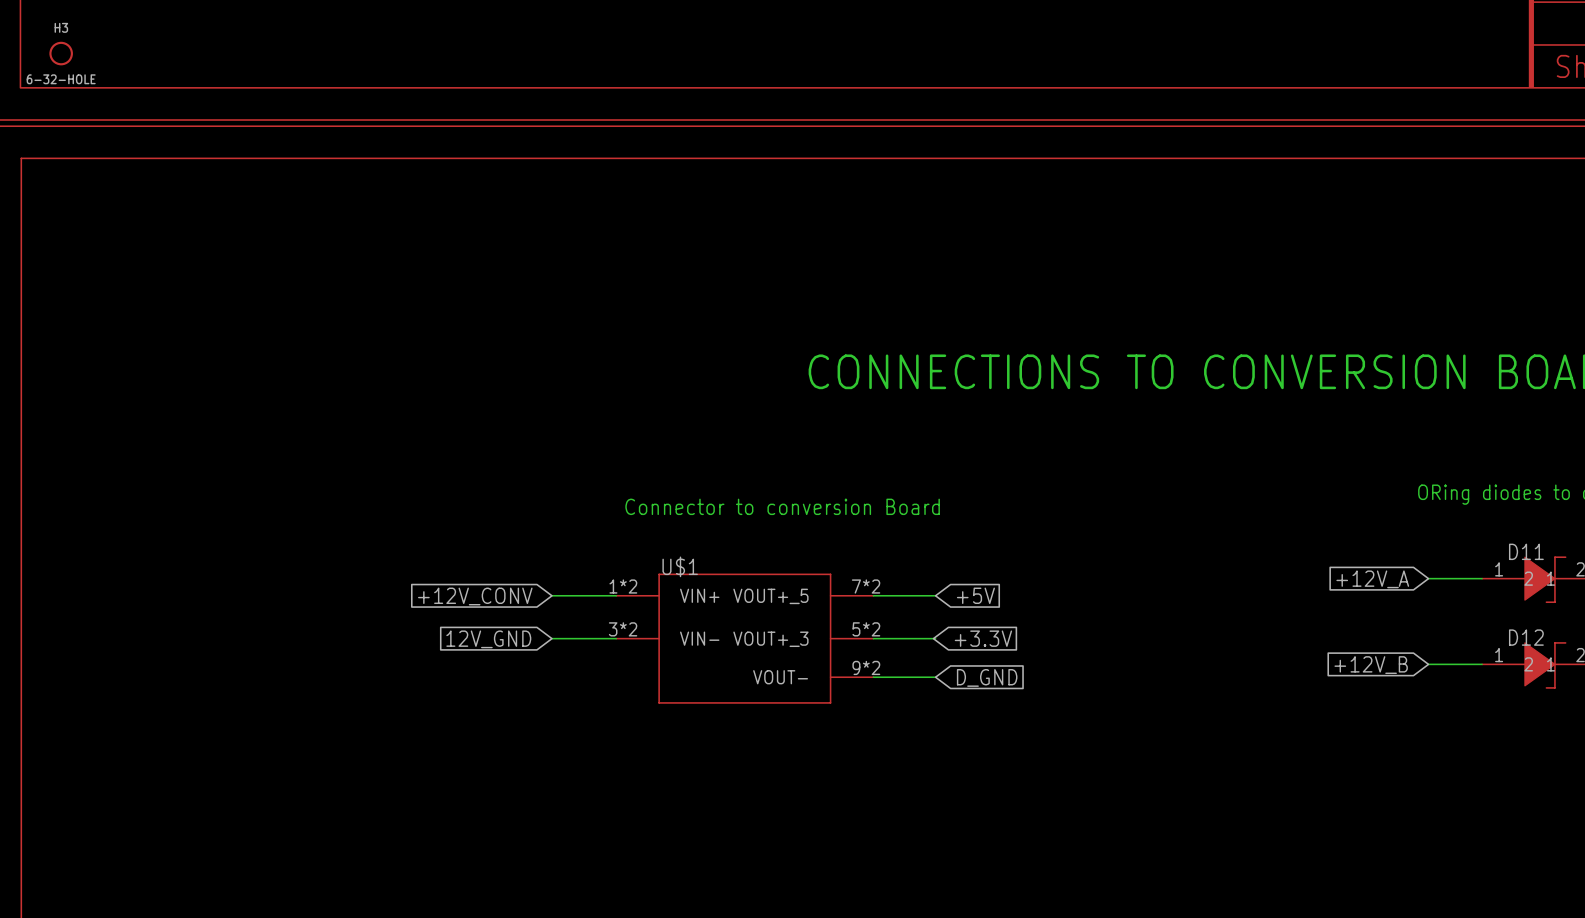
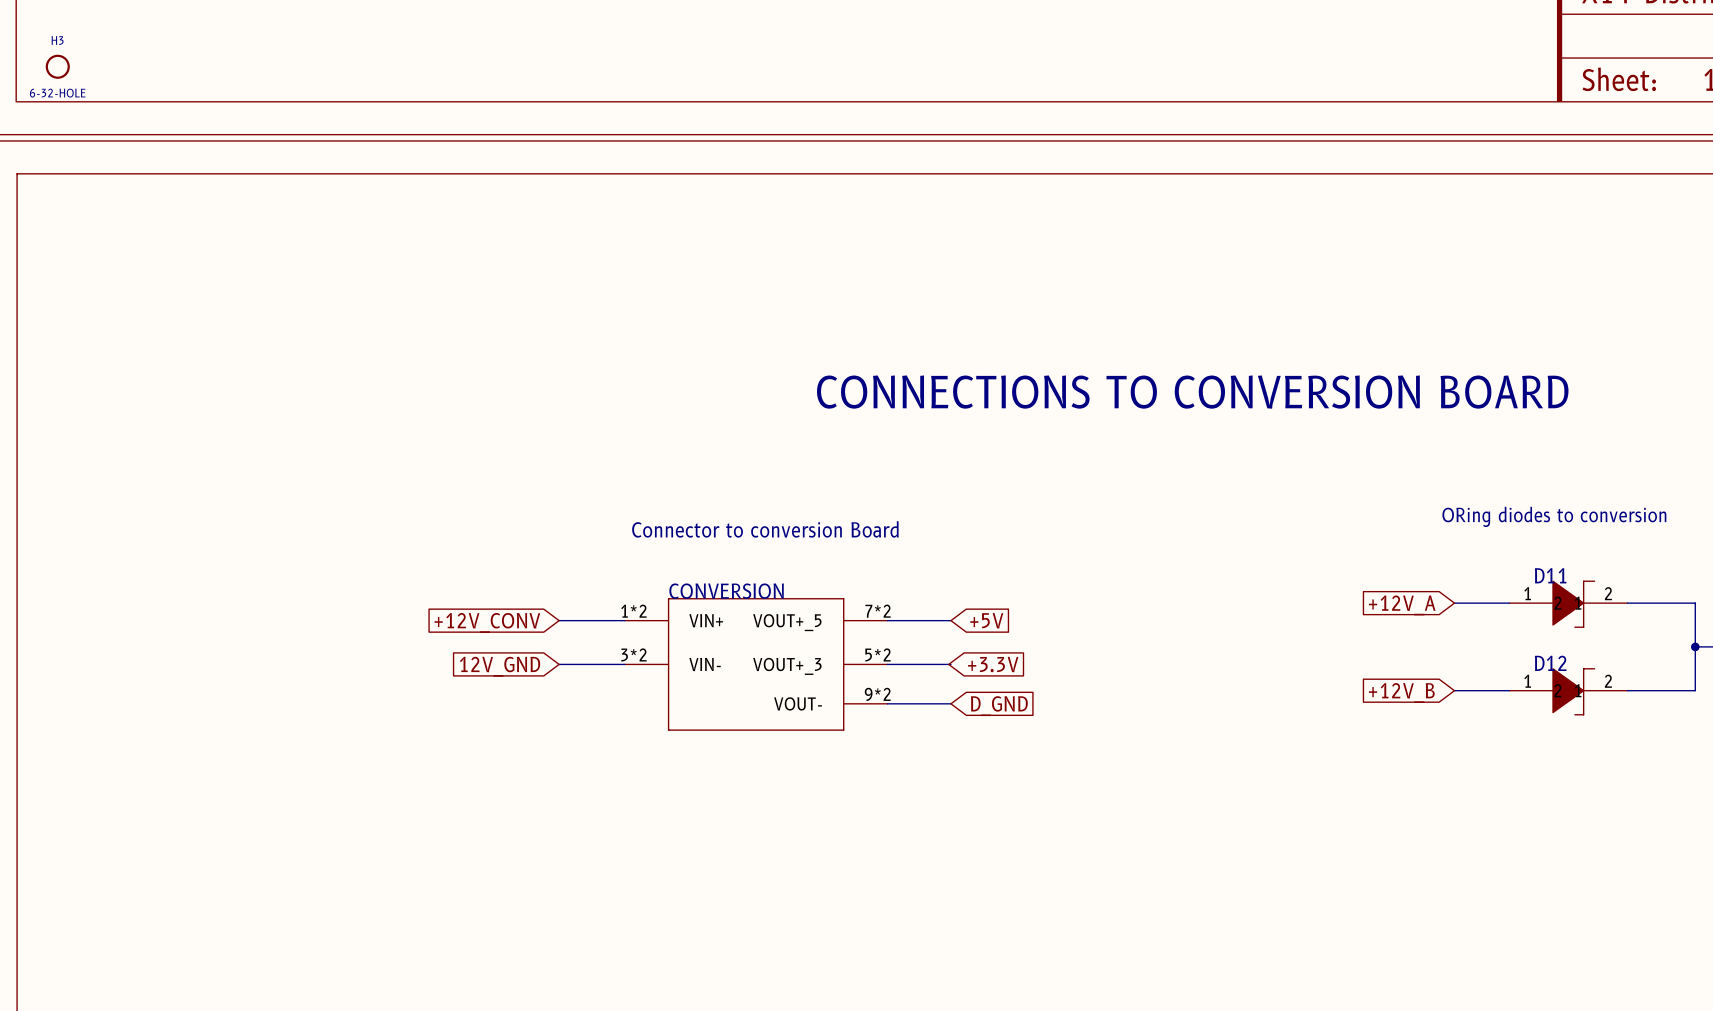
U$1 name: U$1 (680, 566) -> CONVERSION (726, 591)

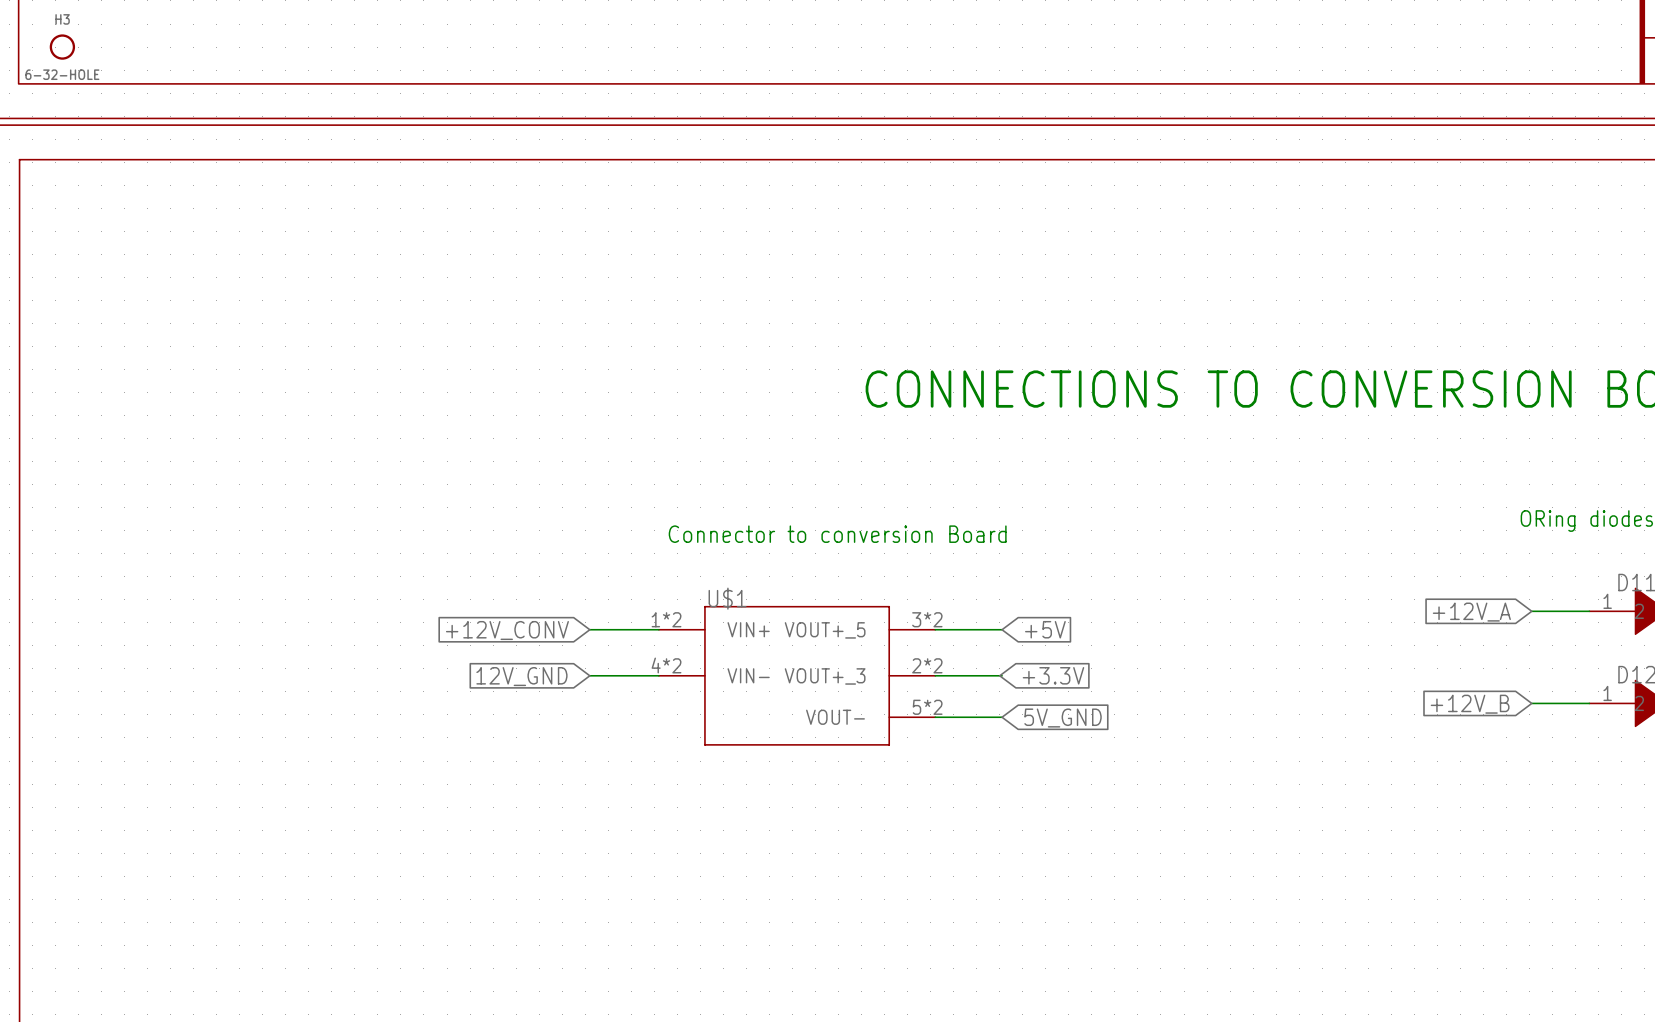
CONVERSION name: CONVERSION (726, 591) -> U$1 (727, 598)
CONVERSION pin number: 7*2 (878, 611) -> 3*2 (927, 619)
CONVERSION pin number: 3*2 (633, 654) -> 4*2 (666, 665)
CONVERSION pin number: 5*2 (878, 654) -> 2*2 (927, 665)
CONVERSION pin number: 9*2 (877, 694) -> 5*2 (927, 707)
global label: D_GND (999, 706) -> 5V_GND (1063, 718)

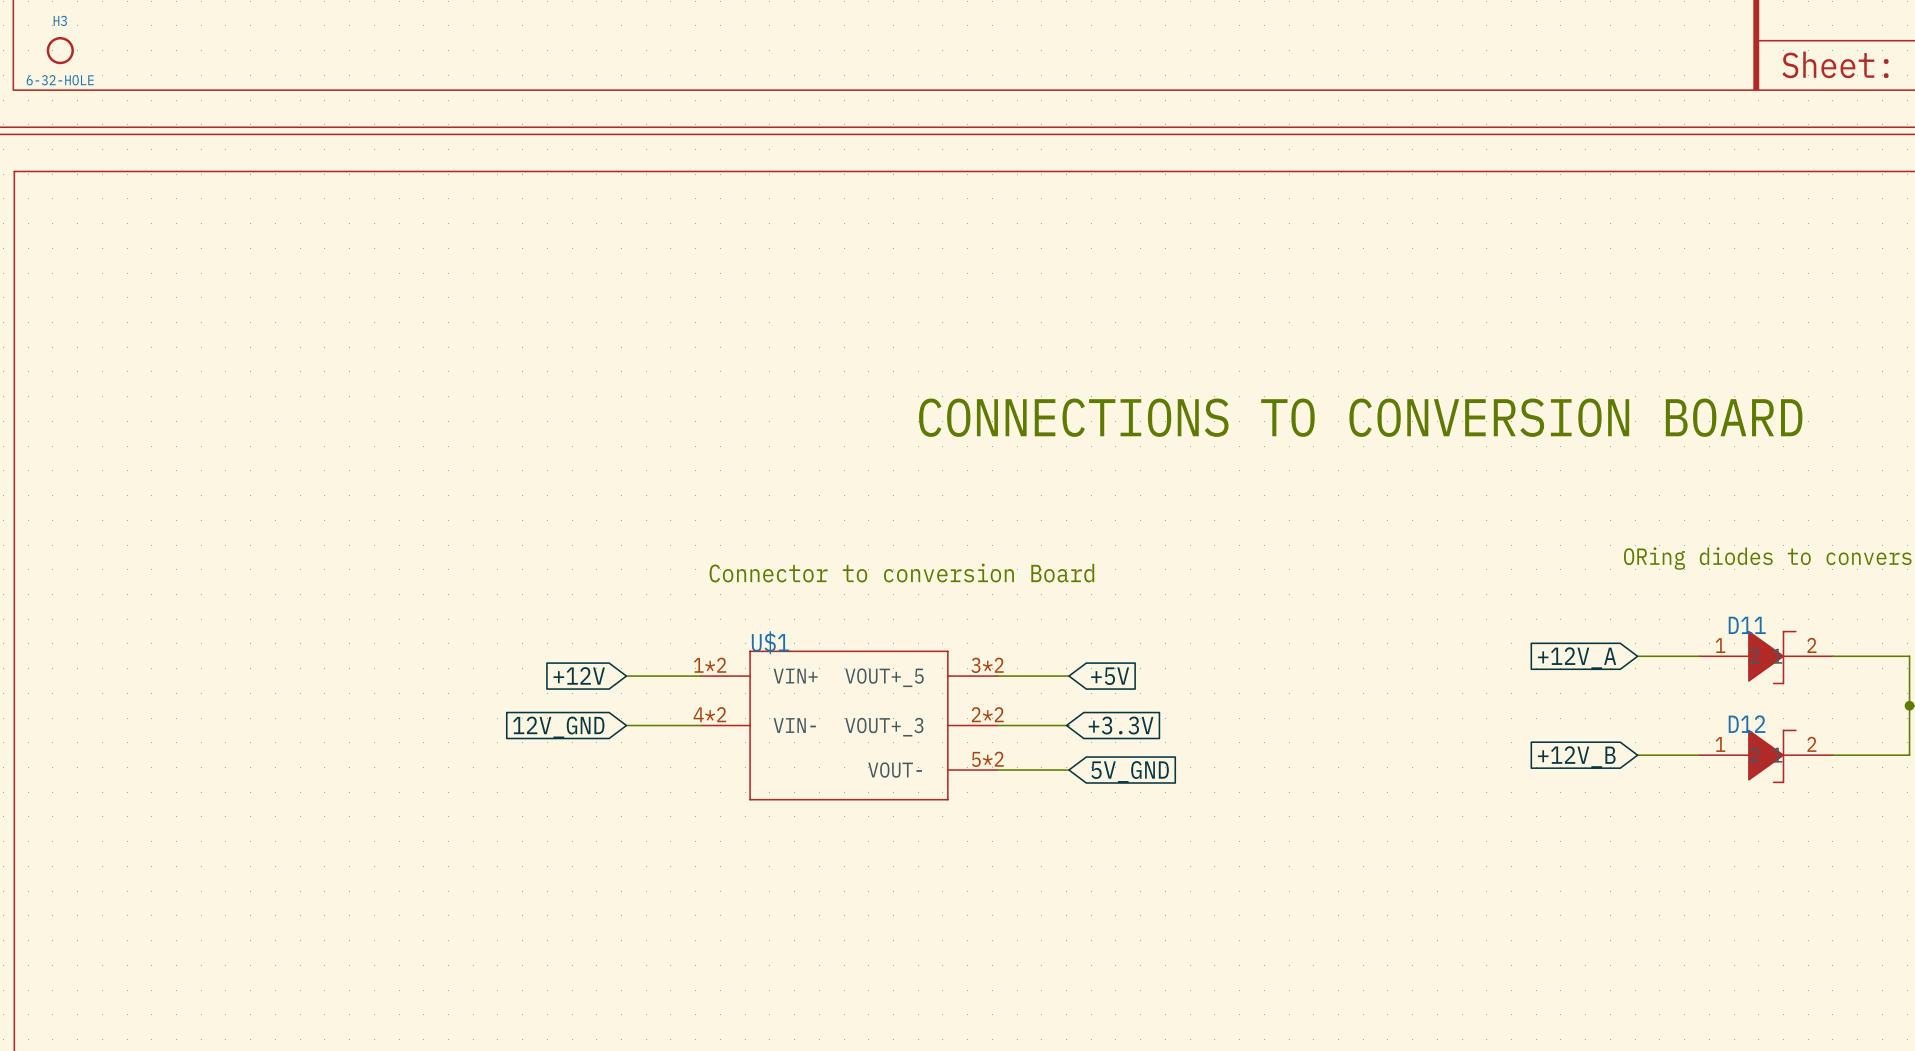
global label: +12V_CONV (507, 630) -> +12V (579, 675)

